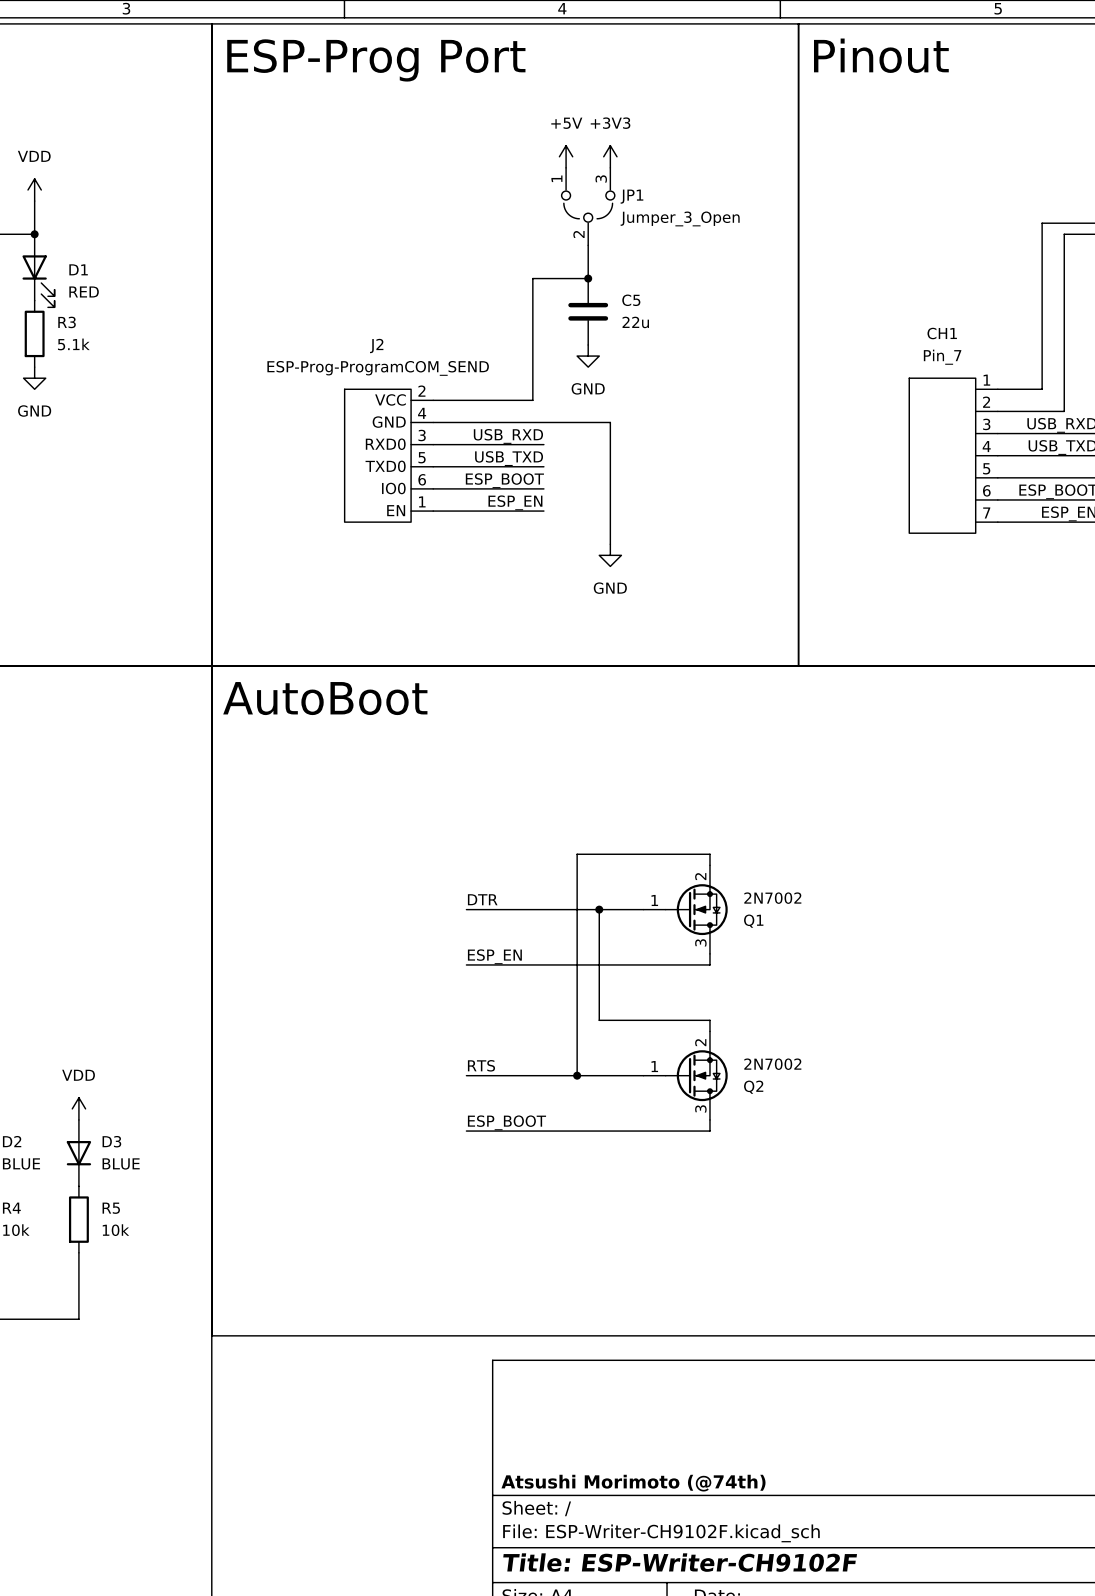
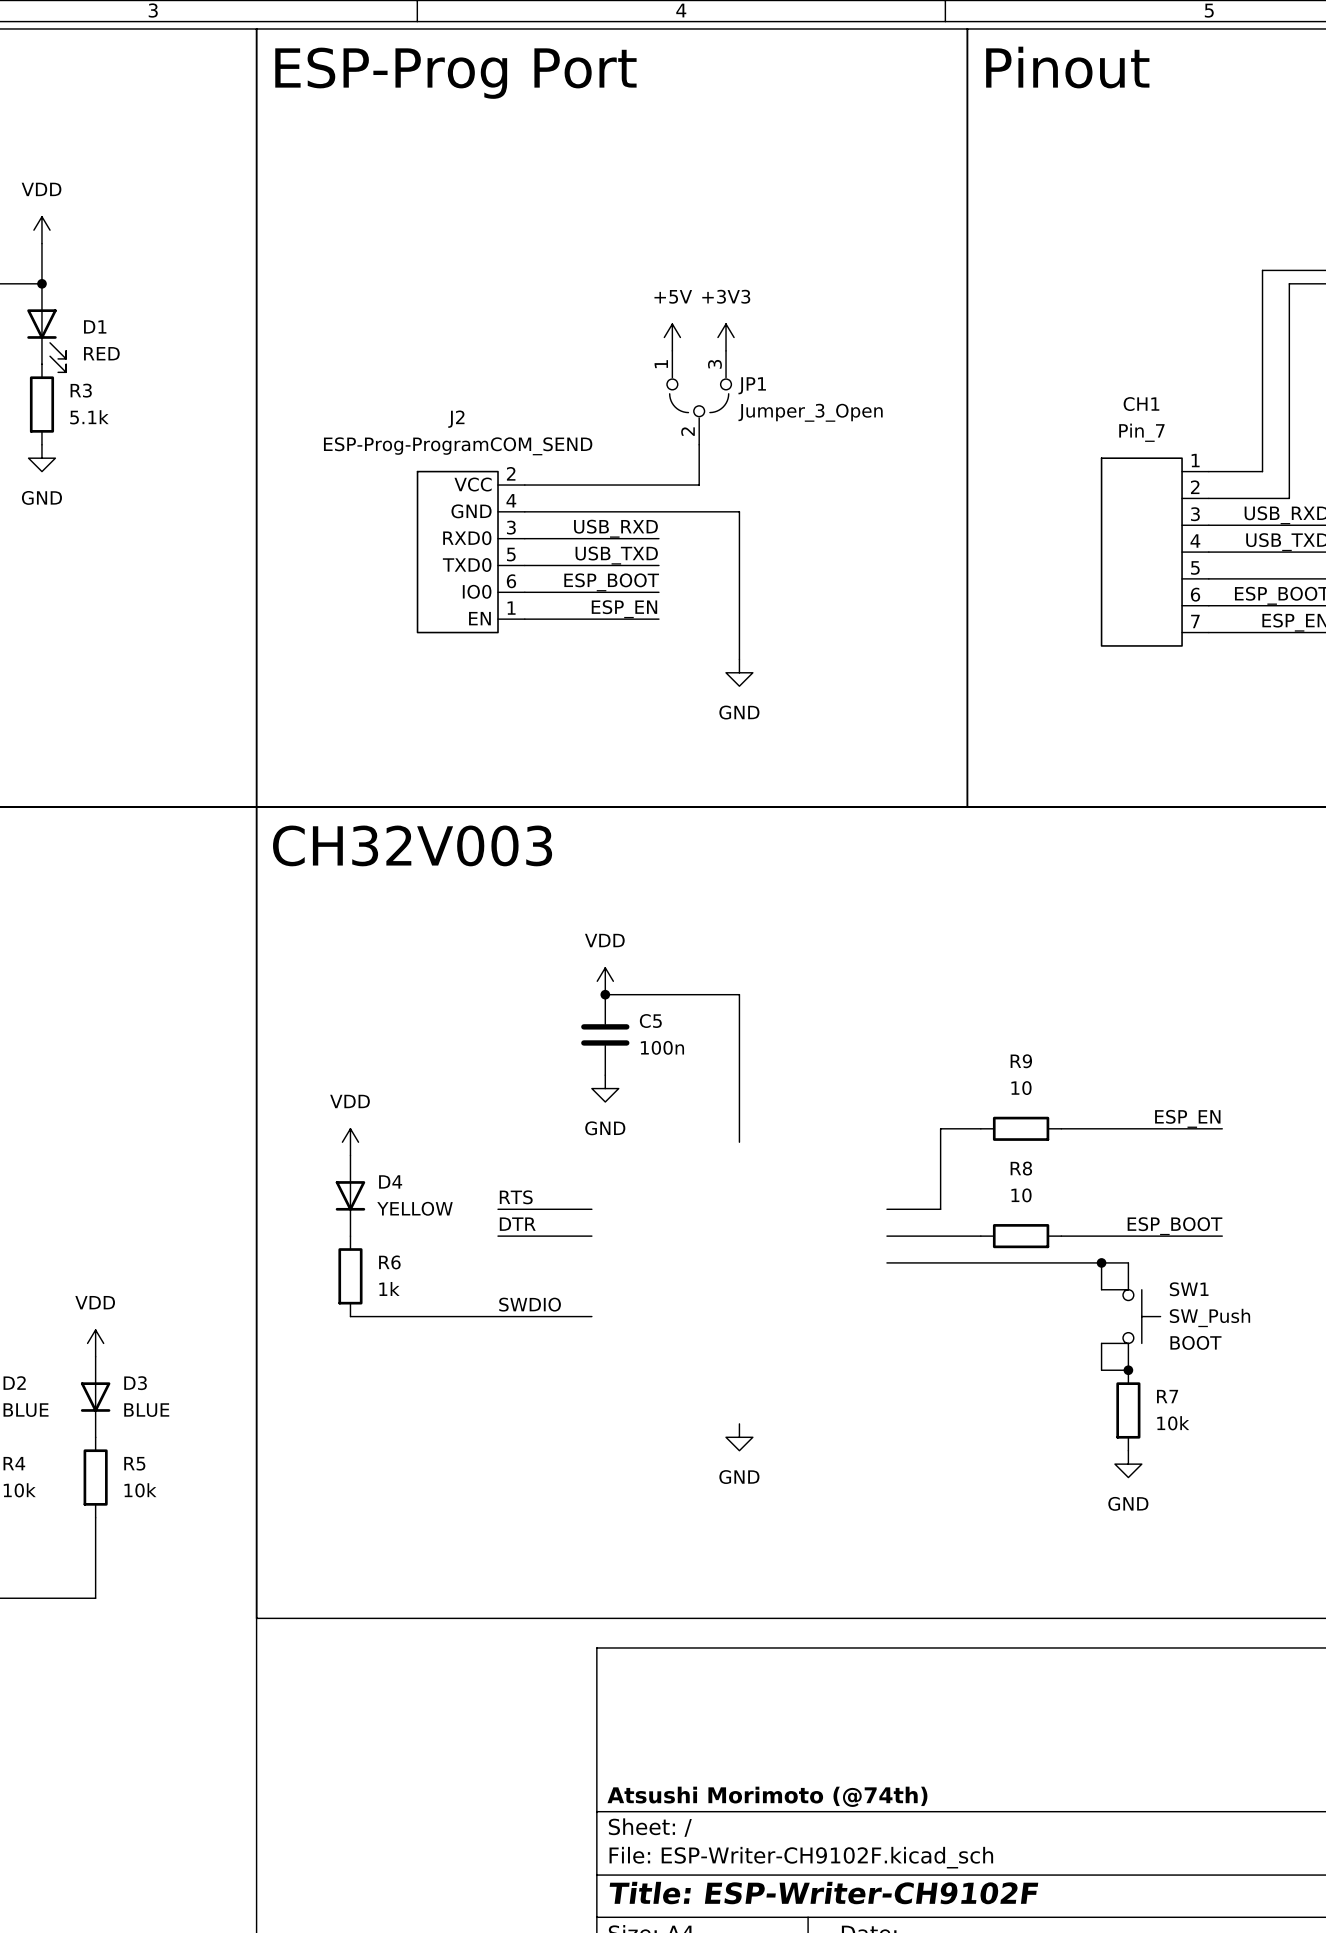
power symbol position: +5V (566, 156) -> +5V (672, 337)
power symbol position: +3V3 (610, 156) -> +3V3 (726, 337)
JP1 position: (588, 206) -> (699, 397)
wire: (588, 245) (588, 278) (532, 278) (532, 400) -> (699, 444) (699, 485) (645, 485)
junction: (588, 278) -> none
C5 name position: C5 (631, 300) -> C5 (650, 1021)
C5 position: (588, 311) -> (605, 1034)
C5 value: 22u (635, 322) -> 100n (662, 1047)
power symbol: GND (588, 356) -> none
text: AutoBoot (325, 698) -> CH32V003 (412, 845)
power symbol: none -> VDD (605, 981)
wire: none -> (605, 994) (739, 994) (739, 1142)
junction: none -> (605, 994)
wire: (709, 865) (709, 854) (577, 854) (577, 1075) -> none
power symbol: none -> GND (605, 1088)
label position: DTR (482, 899) -> DTR (517, 1224)
wire: (466, 909) (643, 909) -> none
wire: (599, 909) (599, 1020) (709, 1020) (709, 1031) -> none
junction: (599, 909) -> none
Q1: 2N7002 (685, 909) -> none
label: none -> ESP_EN (1187, 1118)
wire: none -> (980, 1128) (940, 1128) (940, 1209) (886, 1209)
R9: none -> 10 (1021, 1128)
wire: none -> (1061, 1128) (1222, 1128)
power symbol: none -> VDD (350, 1142)
wire: (709, 953) (709, 964) (466, 964) -> none
label: ESP_EN (494, 956) -> none
D4: none -> YELLOW (350, 1195)
wire: none -> (498, 1209) (591, 1209)
label: none -> ESP_BOOT (1175, 1226)
wire: none -> (498, 1236) (591, 1236)
wire: none -> (886, 1236) (980, 1236)
R8: none -> 10 (1021, 1236)
wire: none -> (1061, 1236) (1222, 1236)
wire: none -> (886, 1262) (1128, 1262)
junction: none -> (1101, 1262)
R6: none -> 1k (350, 1276)
label position: RTS (481, 1065) -> RTS (516, 1197)
wire: (466, 1075) (643, 1075) -> none
junction: (577, 1075) -> none
Q2: 2N7002 (685, 1075) -> none
label: none -> SWDIO (530, 1304)
wire: none -> (350, 1316) (591, 1316)
SW1: none -> SW_Push (1131, 1316)
wire: (709, 1119) (709, 1131) (466, 1131) -> none
label: ESP_BOOT (506, 1122) -> none
wire: none -> (1101, 1370) (1128, 1370)
junction: none -> (1128, 1370)
R7: none -> 10k (1128, 1410)
power symbol: none -> GND (739, 1437)
power symbol: none -> GND (1128, 1464)

